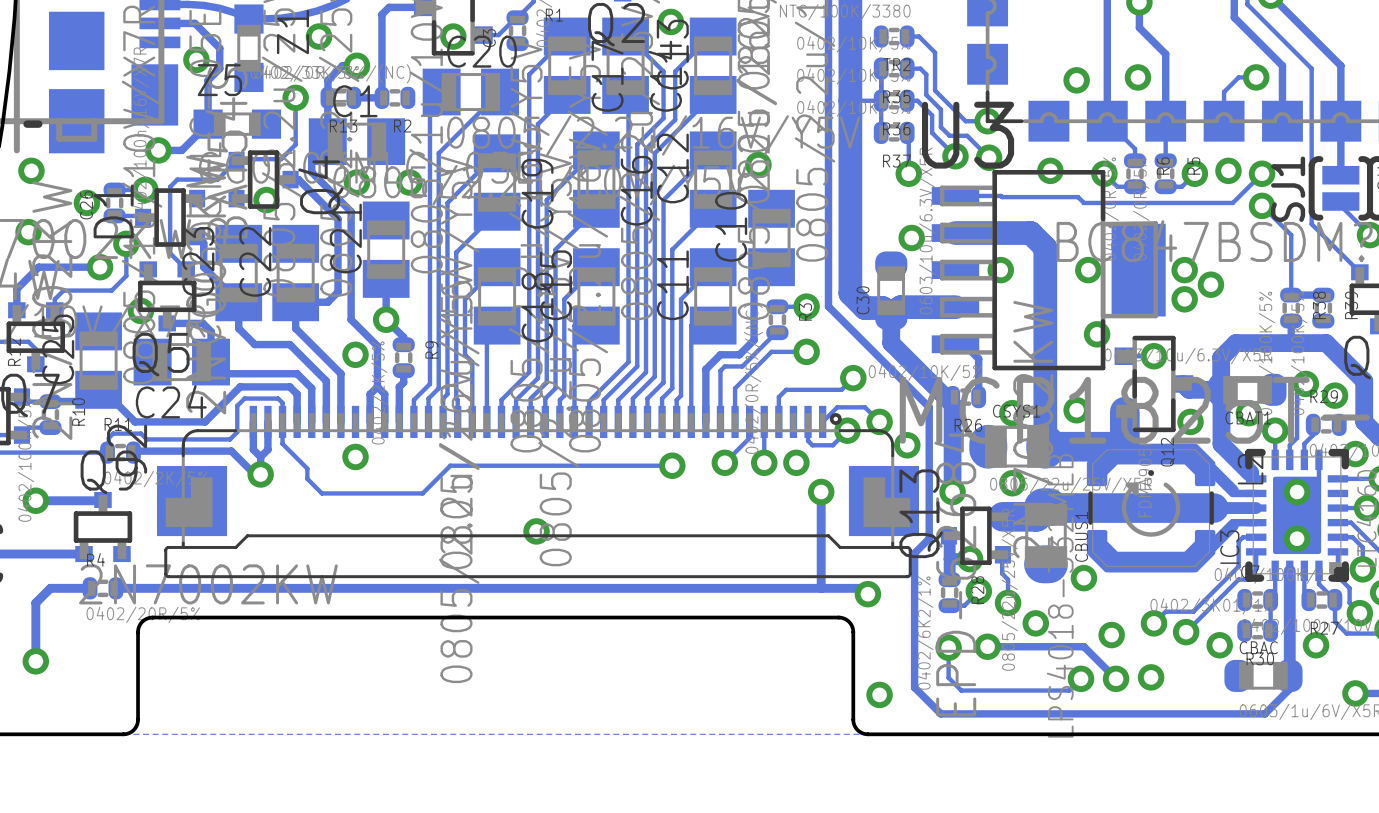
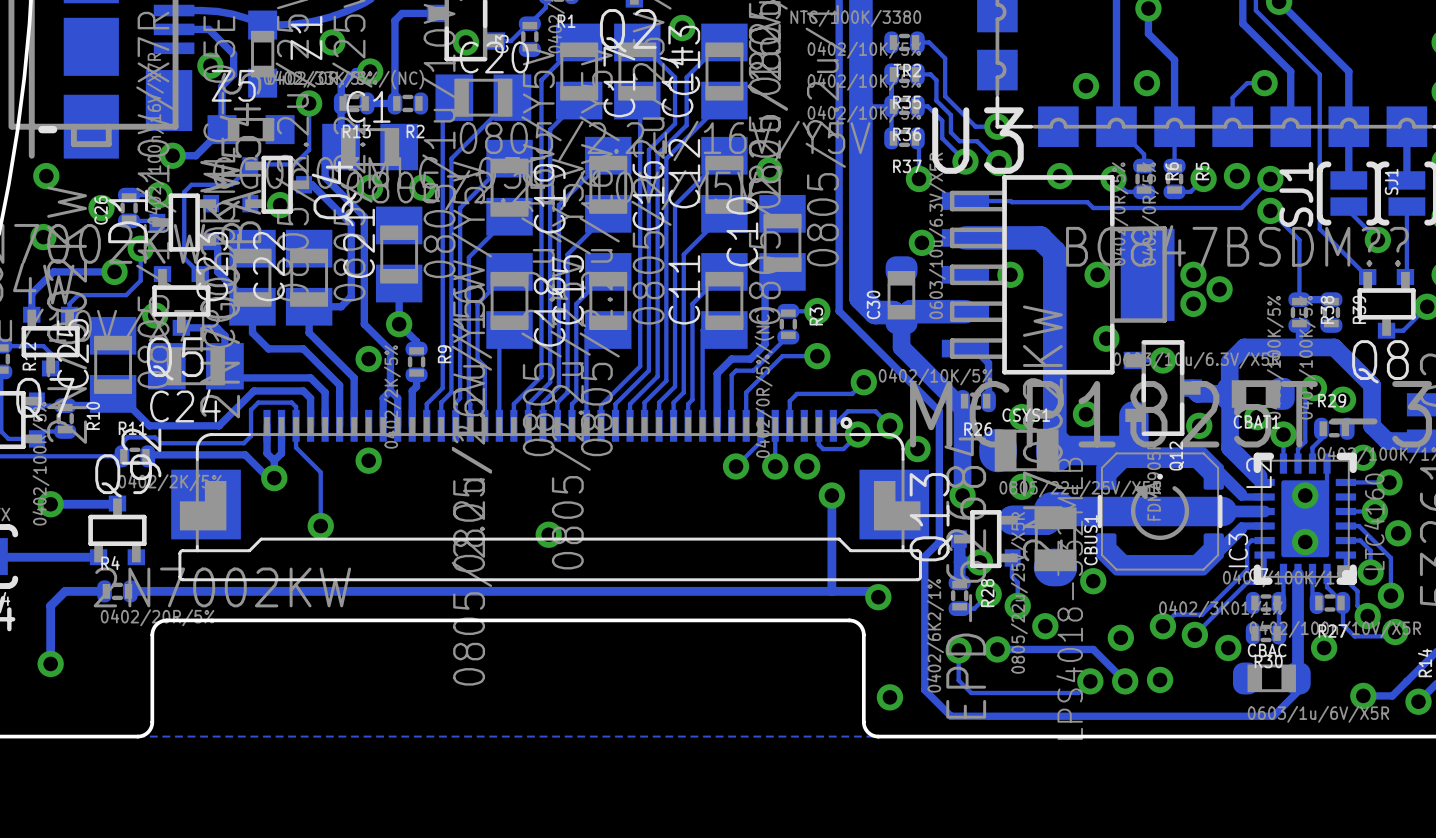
track: (672, 465) (450, 465) (422, 493) (321, 493) (307, 478) -> (320, 526) (320, 482)
via: (672, 465) -> none
via: none -> (320, 526)

